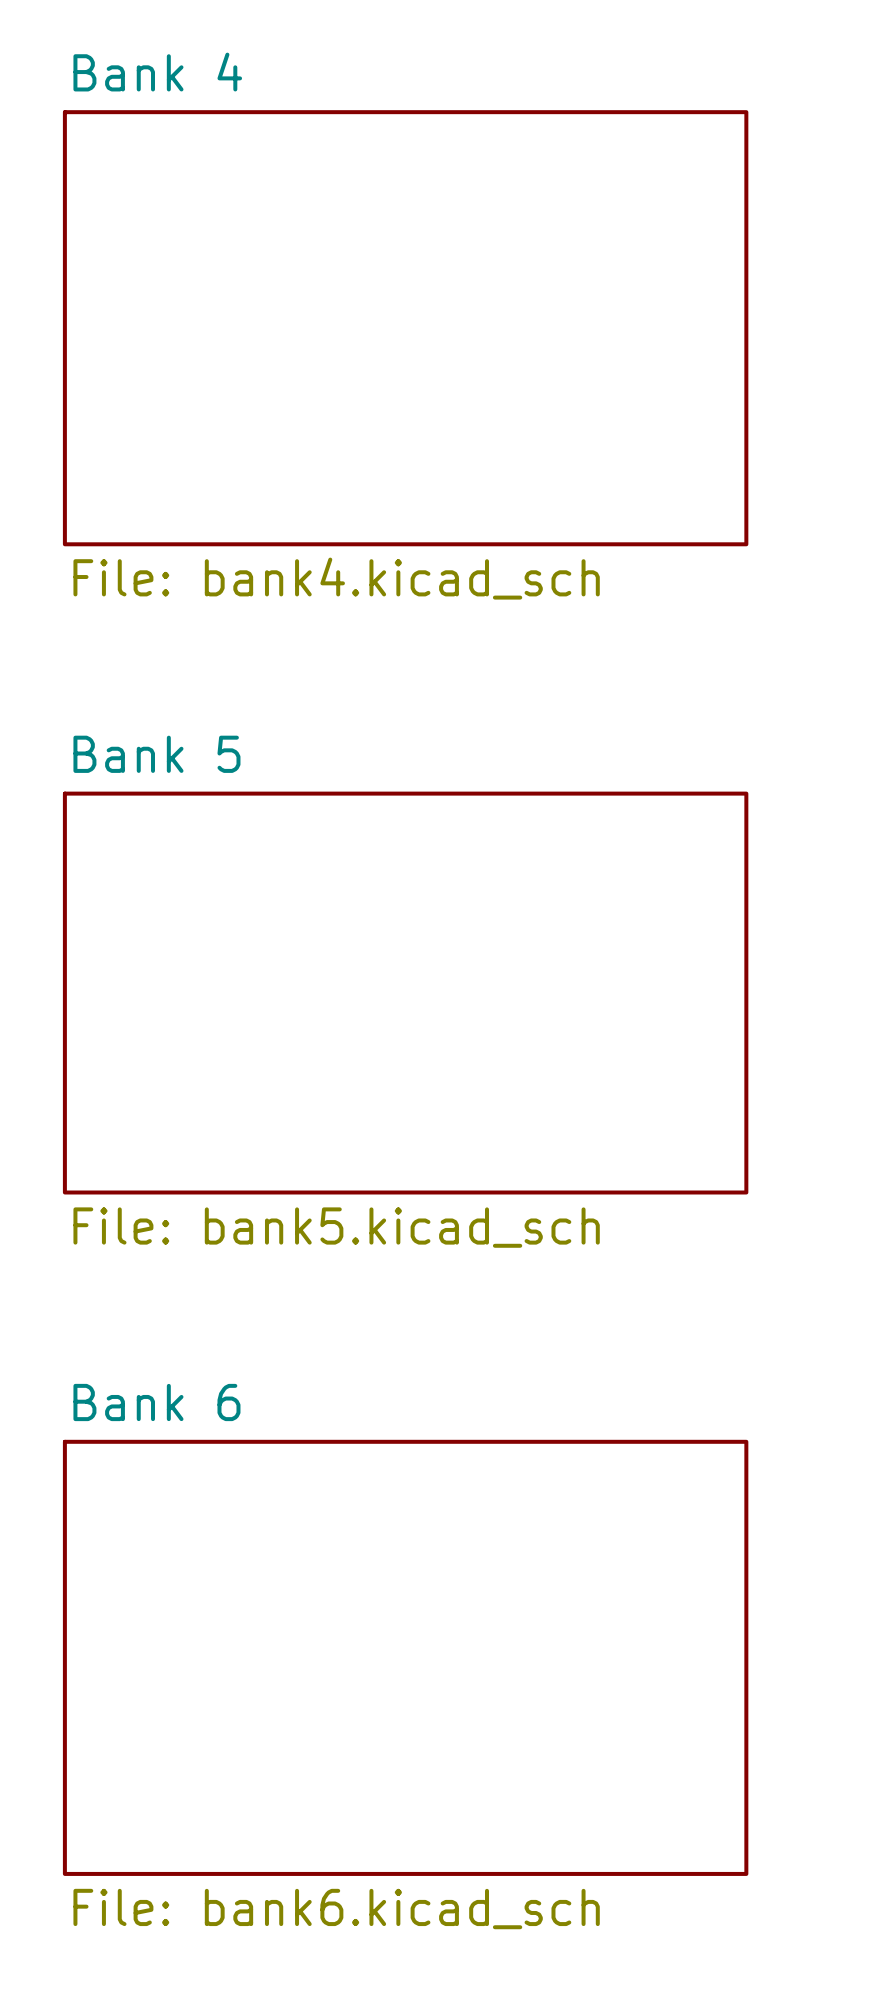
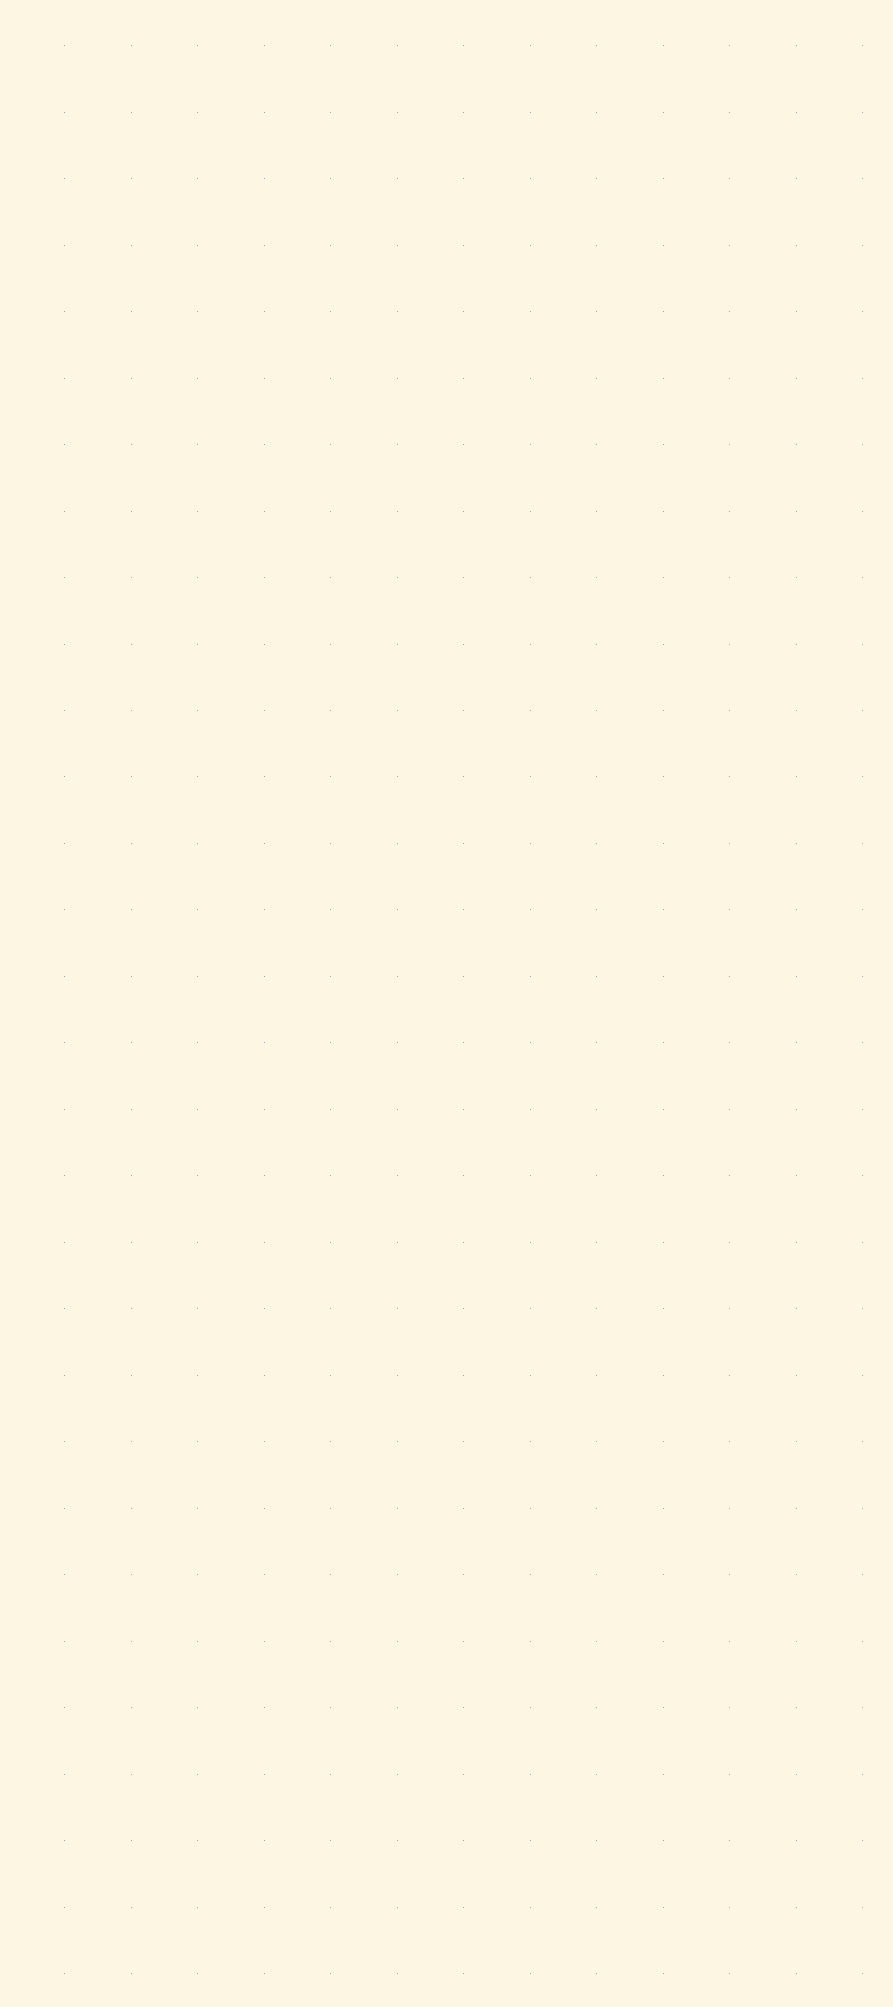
sheet Bank 4: File: bank4.kicad_sch (405, 328) -> none
sheet Bank 5: File: bank5.kicad_sch (405, 993) -> none
sheet Bank 6: File: bank6.kicad_sch (405, 1657) -> none

